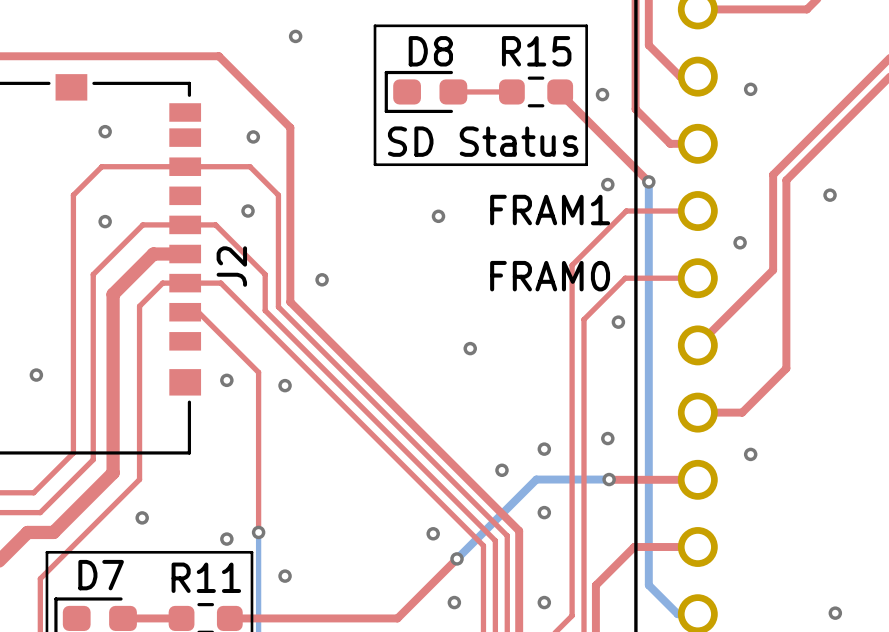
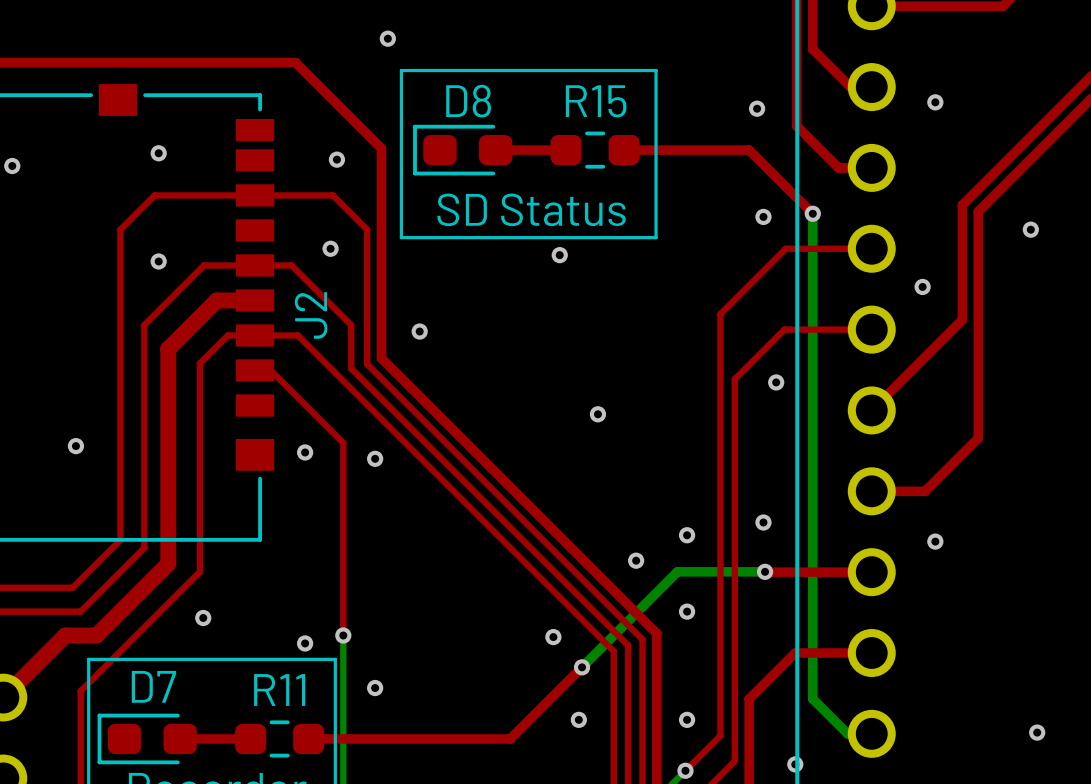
line: (375, 25) (586, 25) (586, 164) (375, 164) (375, 25) -> (401, 70) (656, 70) (656, 237) (401, 237) (401, 70)
D8 position: (425, 91) -> (462, 150)
top track: (453, 91) (511, 91) -> (495, 150) (566, 150)
R15 position: (536, 91) -> (595, 150)
top track: (560, 93) (595, 129) -> (624, 150) (749, 150)
text position: SD Status (483, 141) -> SD Status (531, 209)
text: FRAM1 (550, 210) -> none
text: FRAM0 (550, 276) -> none

